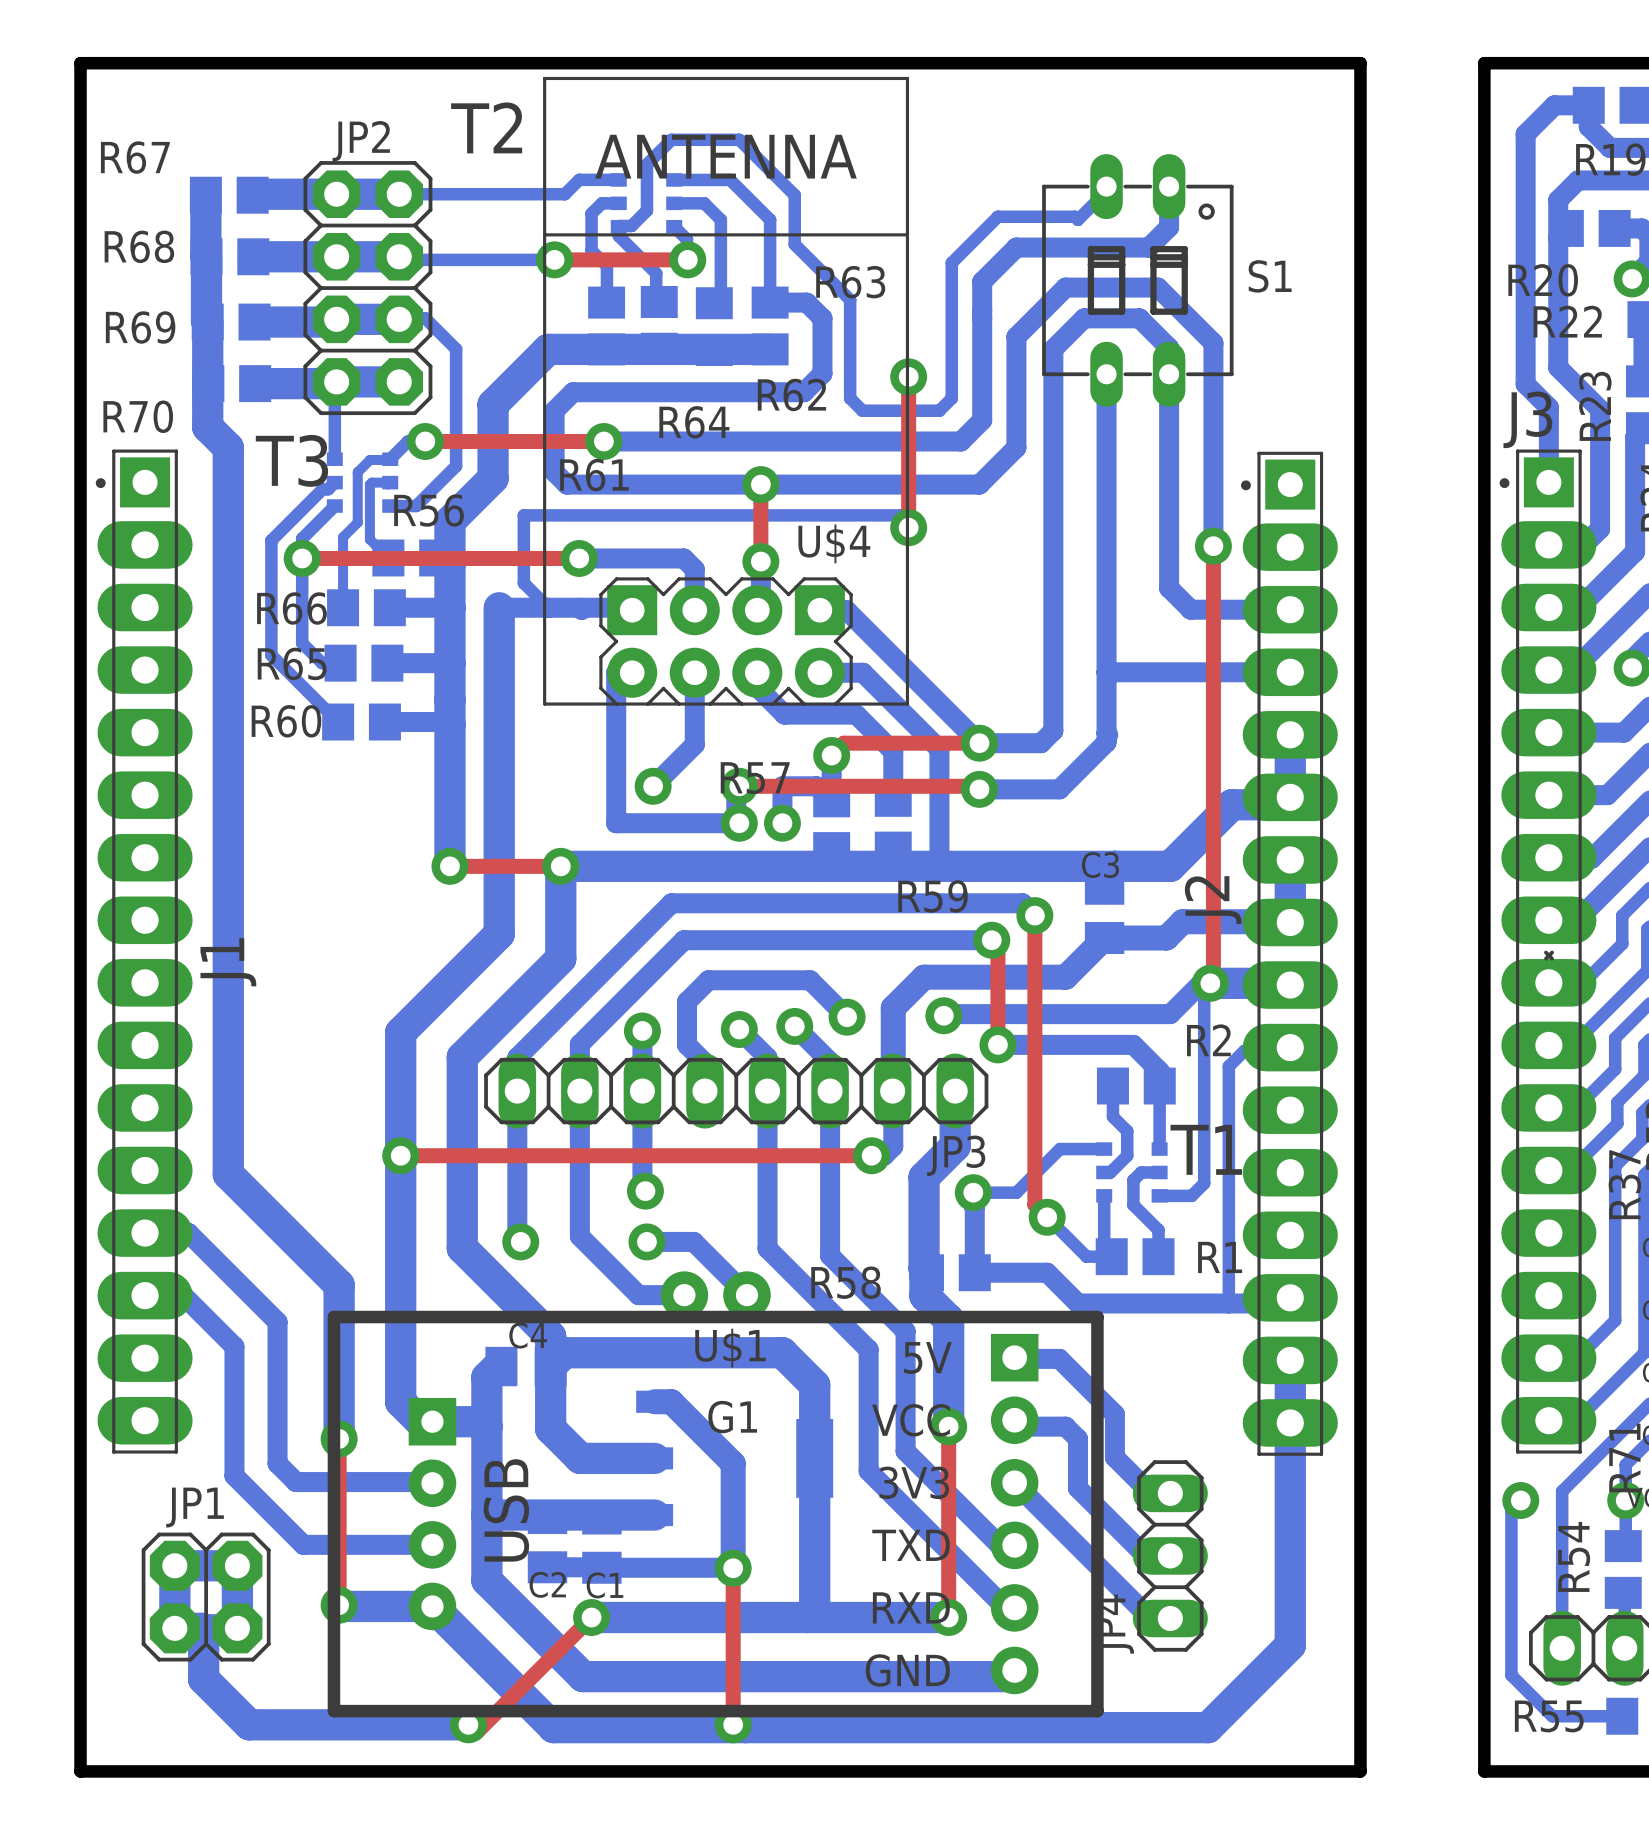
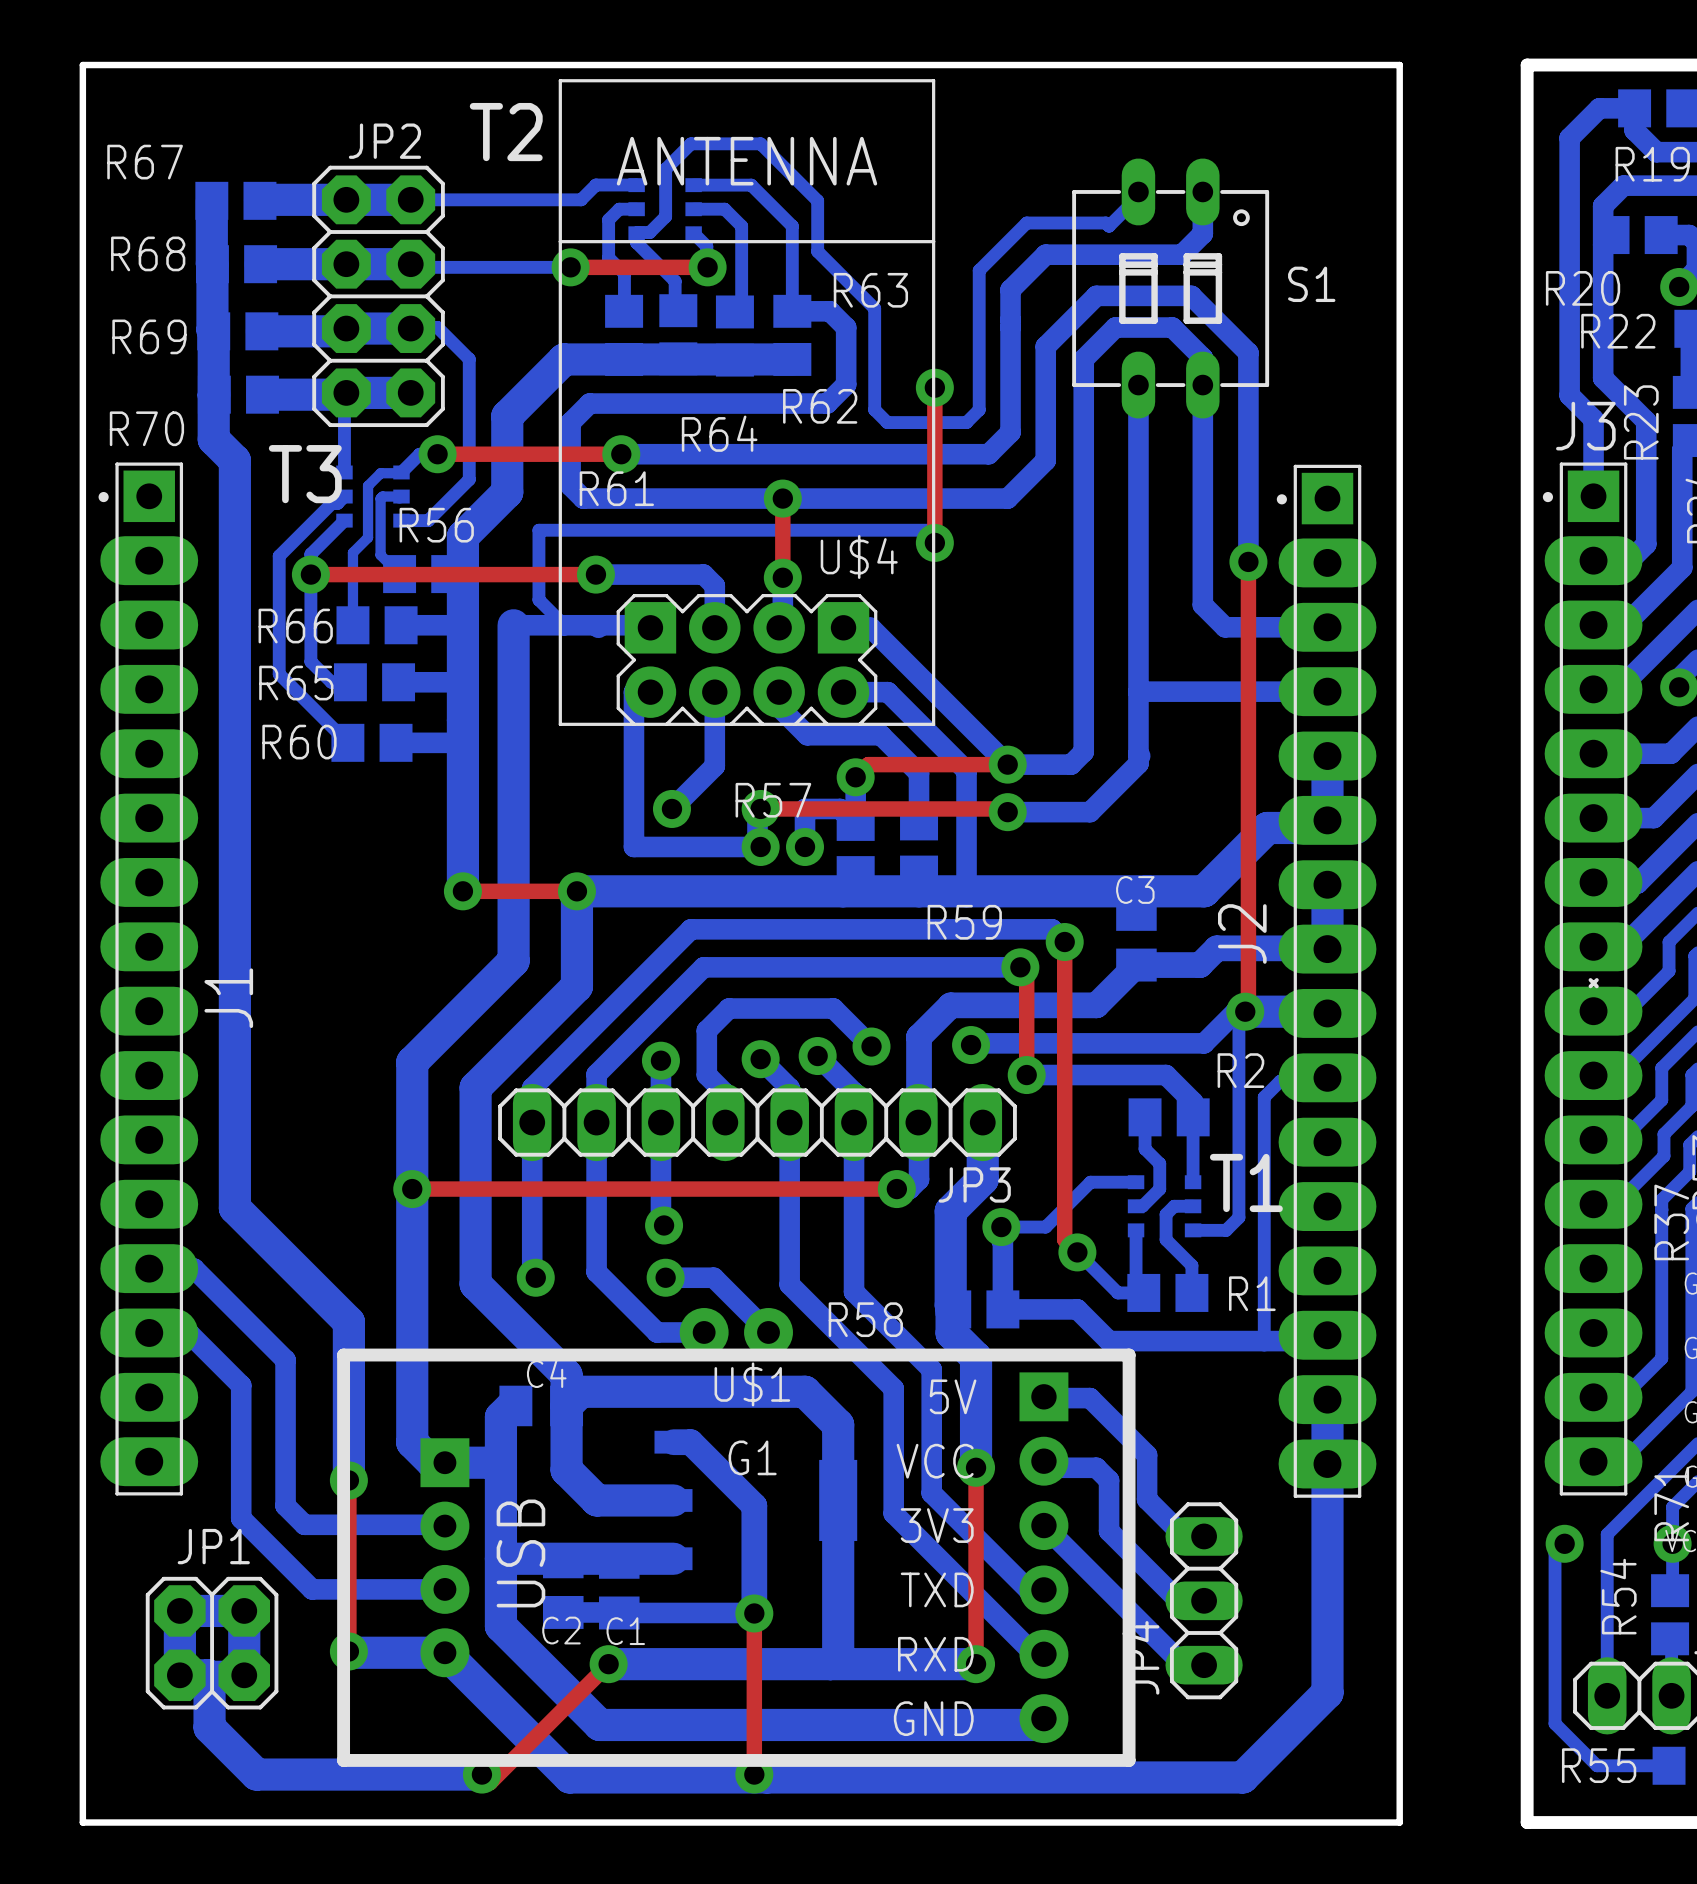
board edge width: thick (80, 63) (1360, 63) (1360, 1771) (80, 1771) (80, 63) -> thin (82, 65) (1399, 65) (1399, 1822) (82, 1822) (82, 65)

